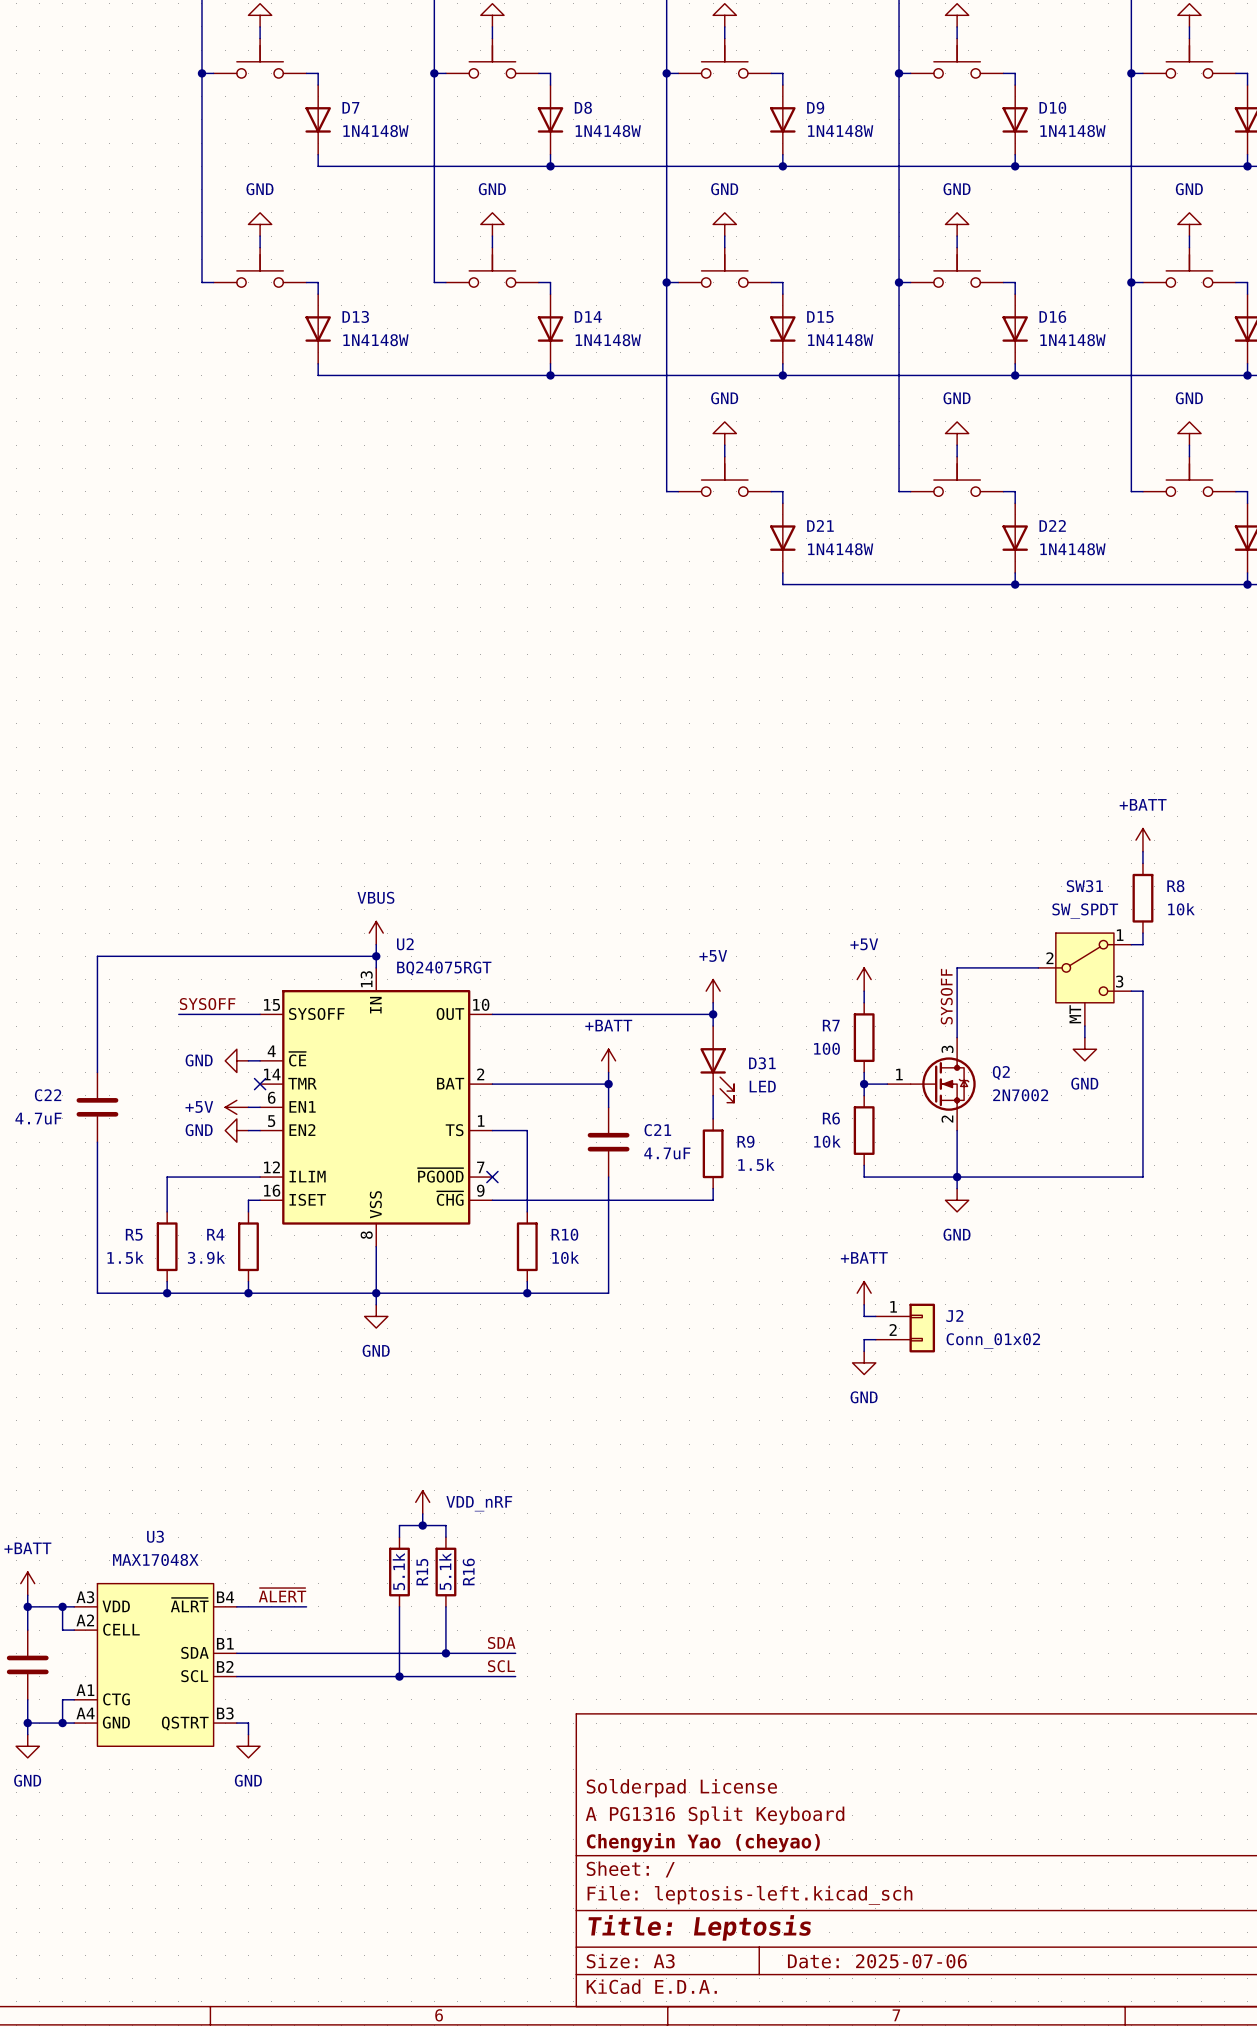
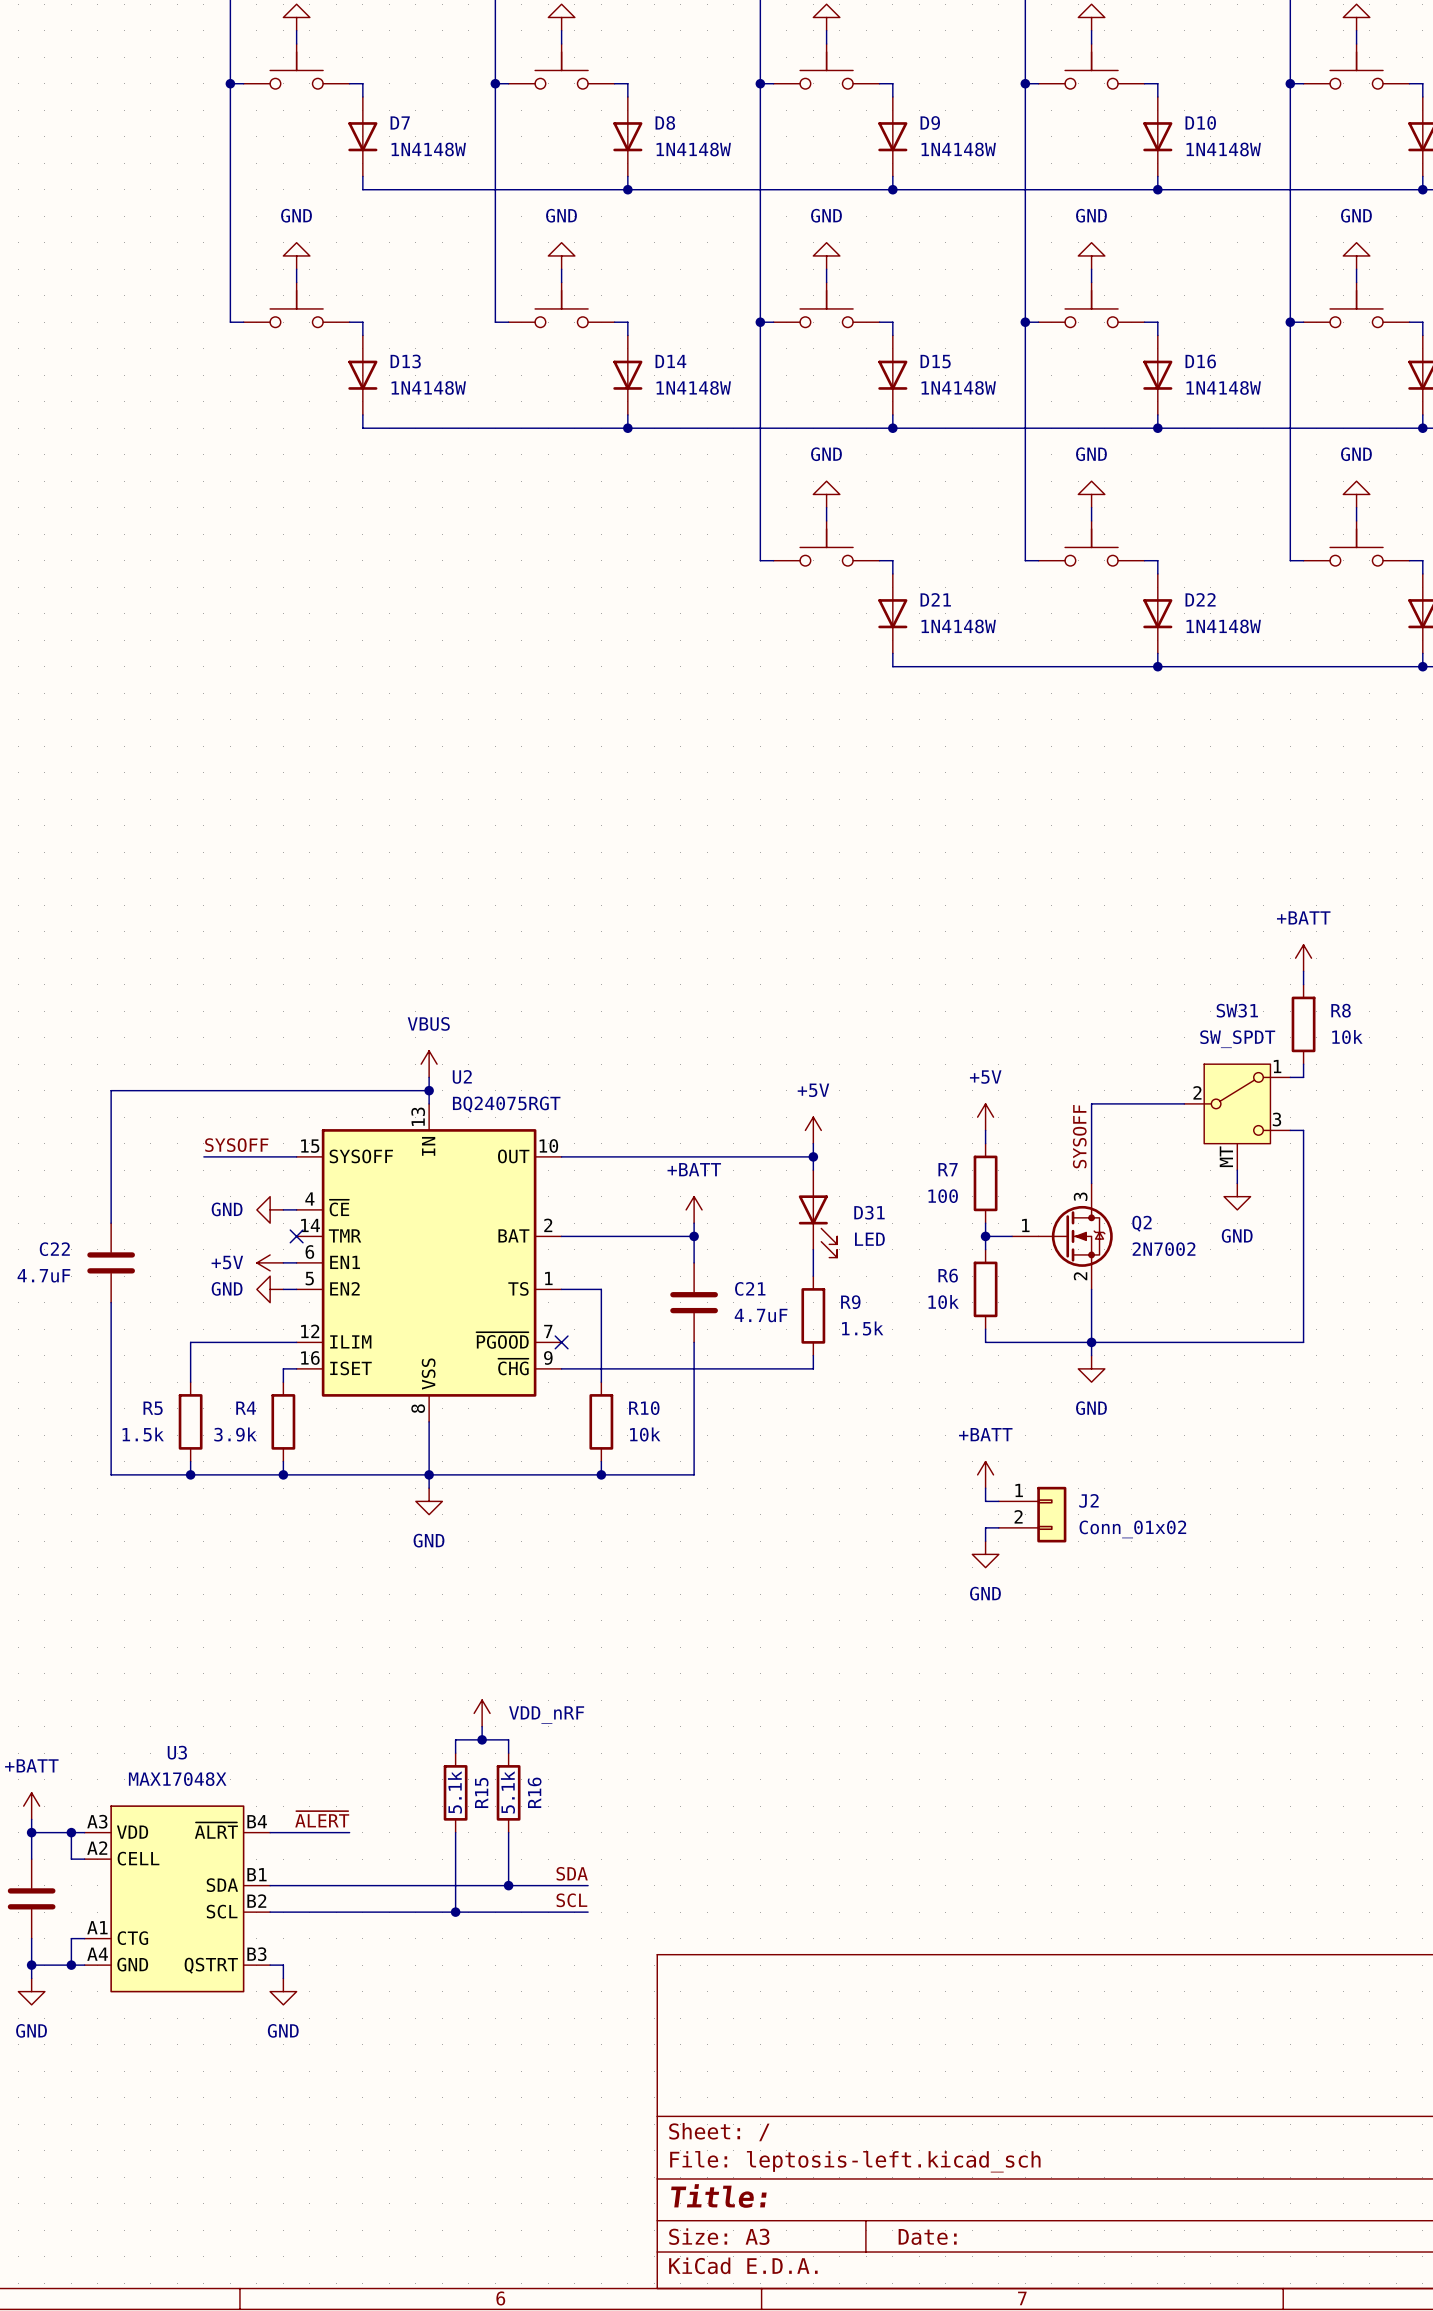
title block: Solderpad License (681, 1788) -> none
title block: A PG1316 Split Keyboard (715, 1815) -> none
title block: Chengyin Yao (cheyao) (703, 1842) -> none
title block: Title: Leptosis (699, 1927) -> Title: (718, 2195)
title block: Date: 2025-07-06 (877, 1961) -> Date: (927, 2236)

